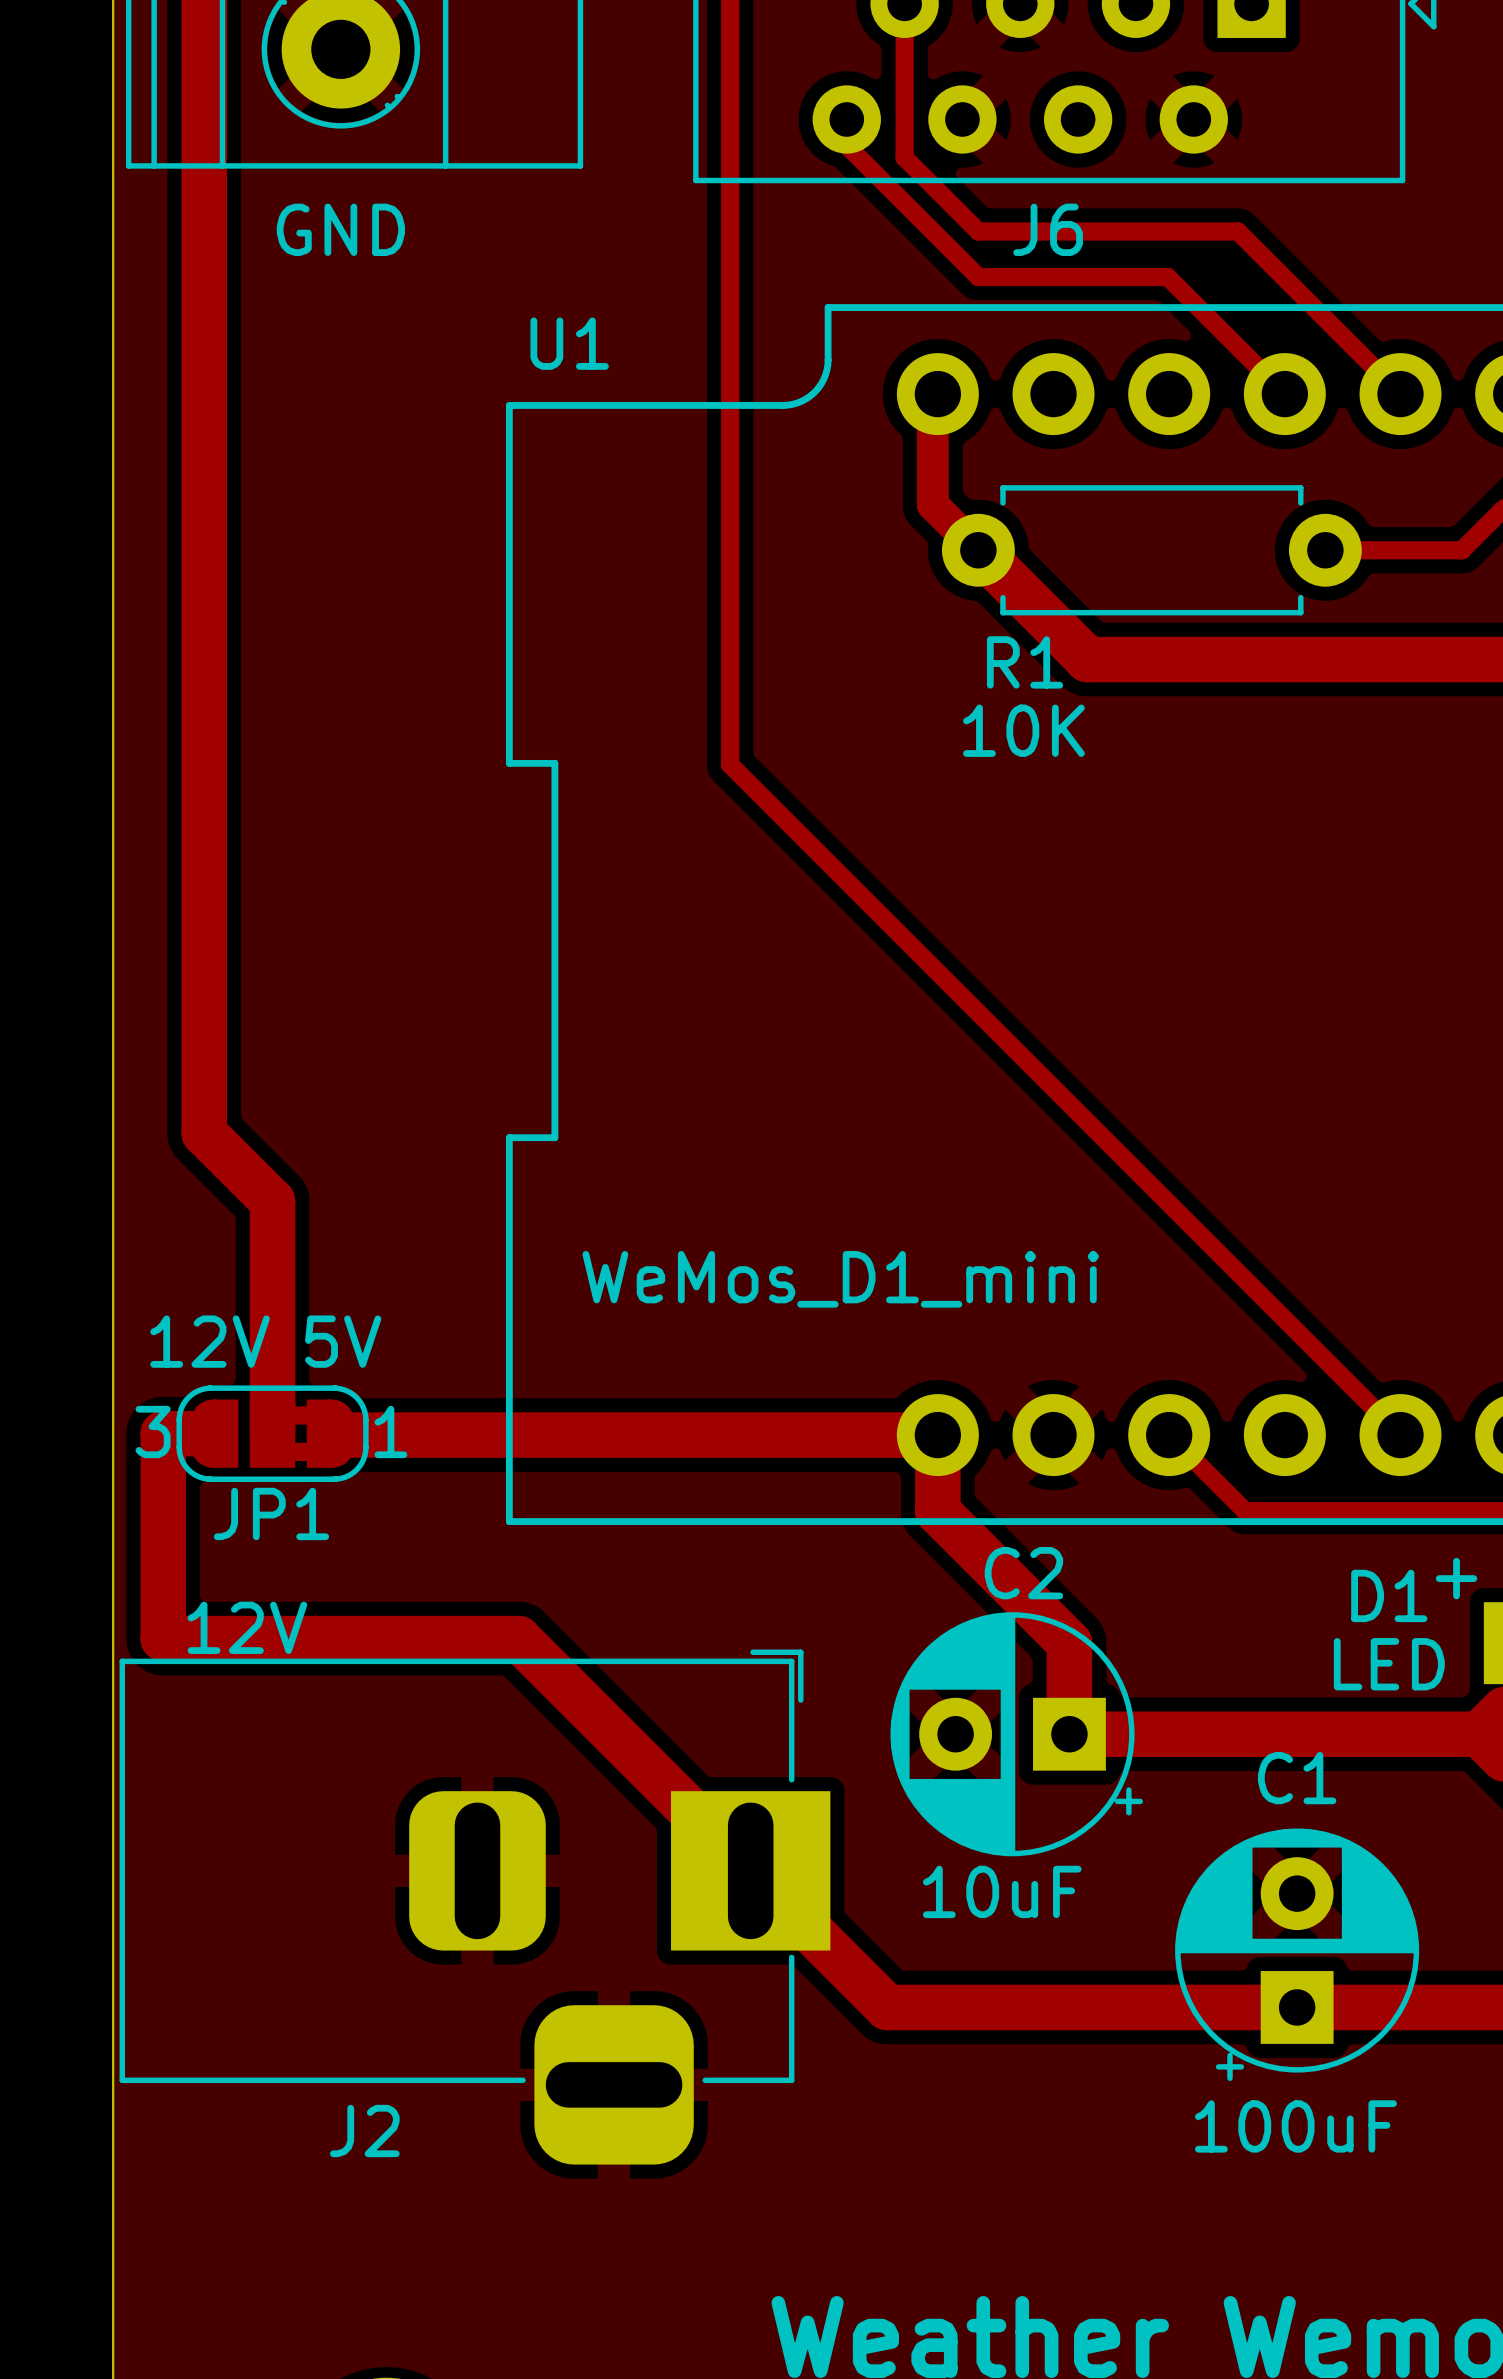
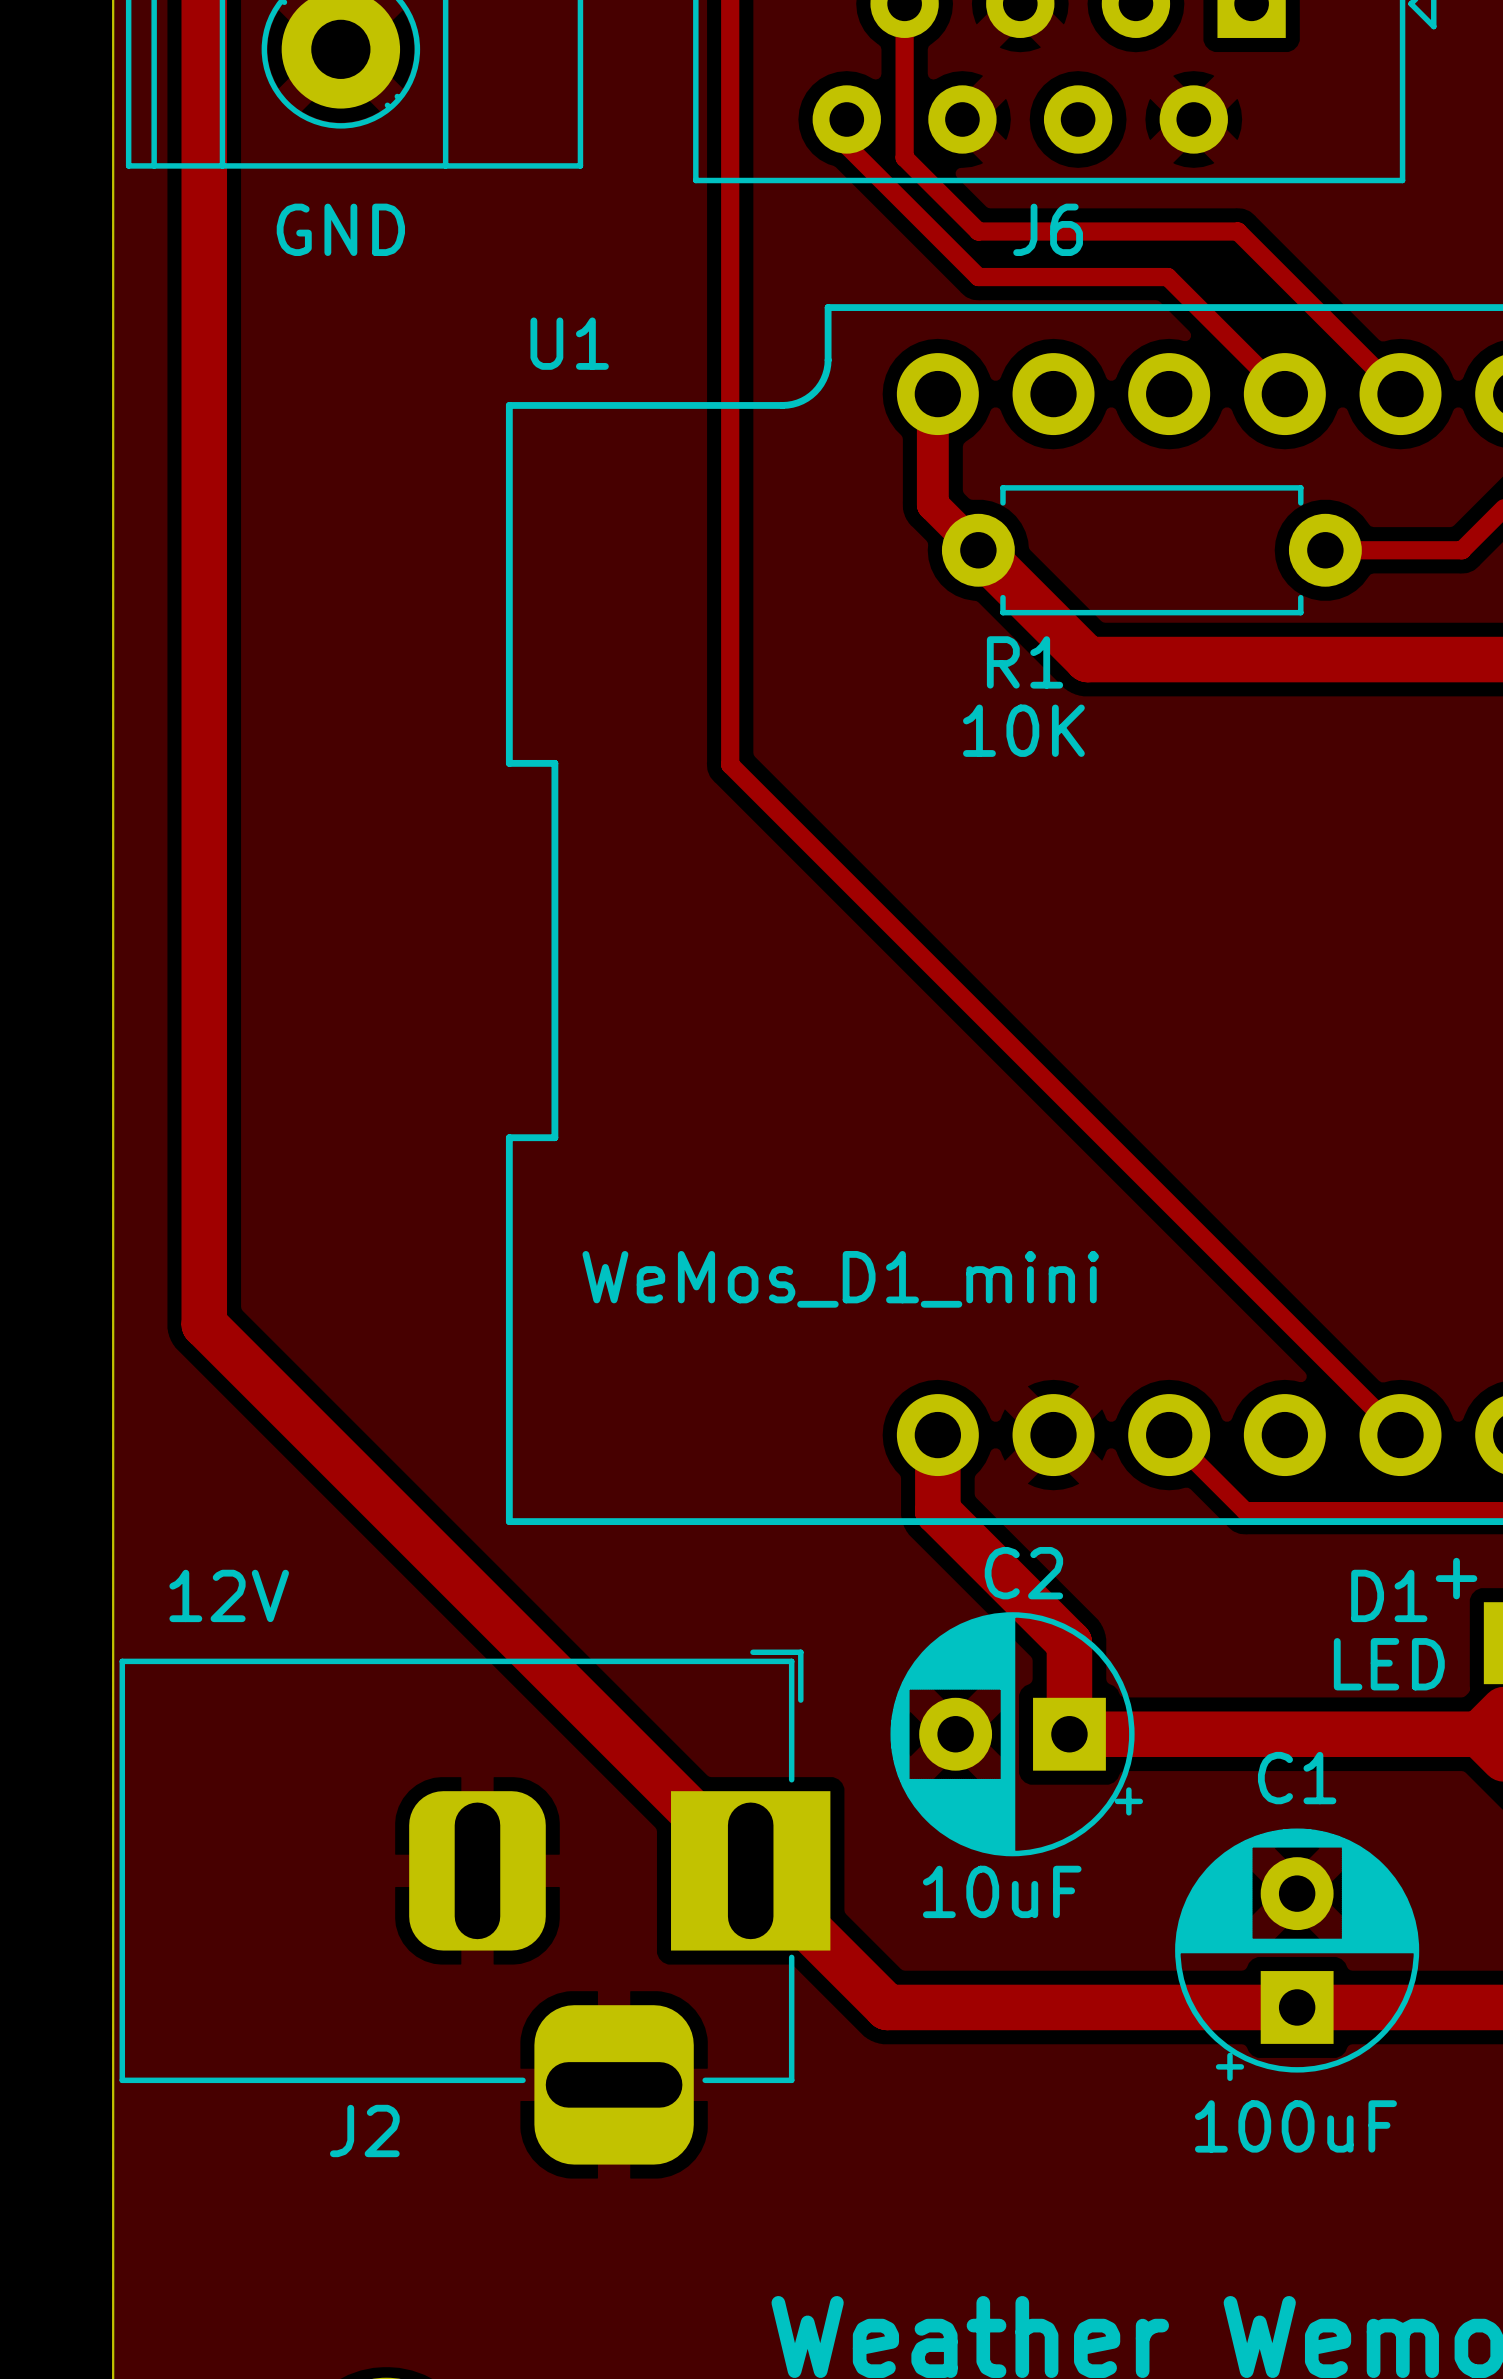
track: (204, 1133) (272, 1201) (272, 1433) -> none
text: 12V (210, 1341) -> none
text: 5V (343, 1341) -> none
track: (213, 1433) (163, 1433) (163, 1638) (518, 1638) -> (204, 1133) (204, 1324) (518, 1638)
JP1: (272, 1433) -> none
track: (331, 1433) (937, 1435) -> none
J2 value position: 12V (247, 1627) -> 12V (229, 1595)

